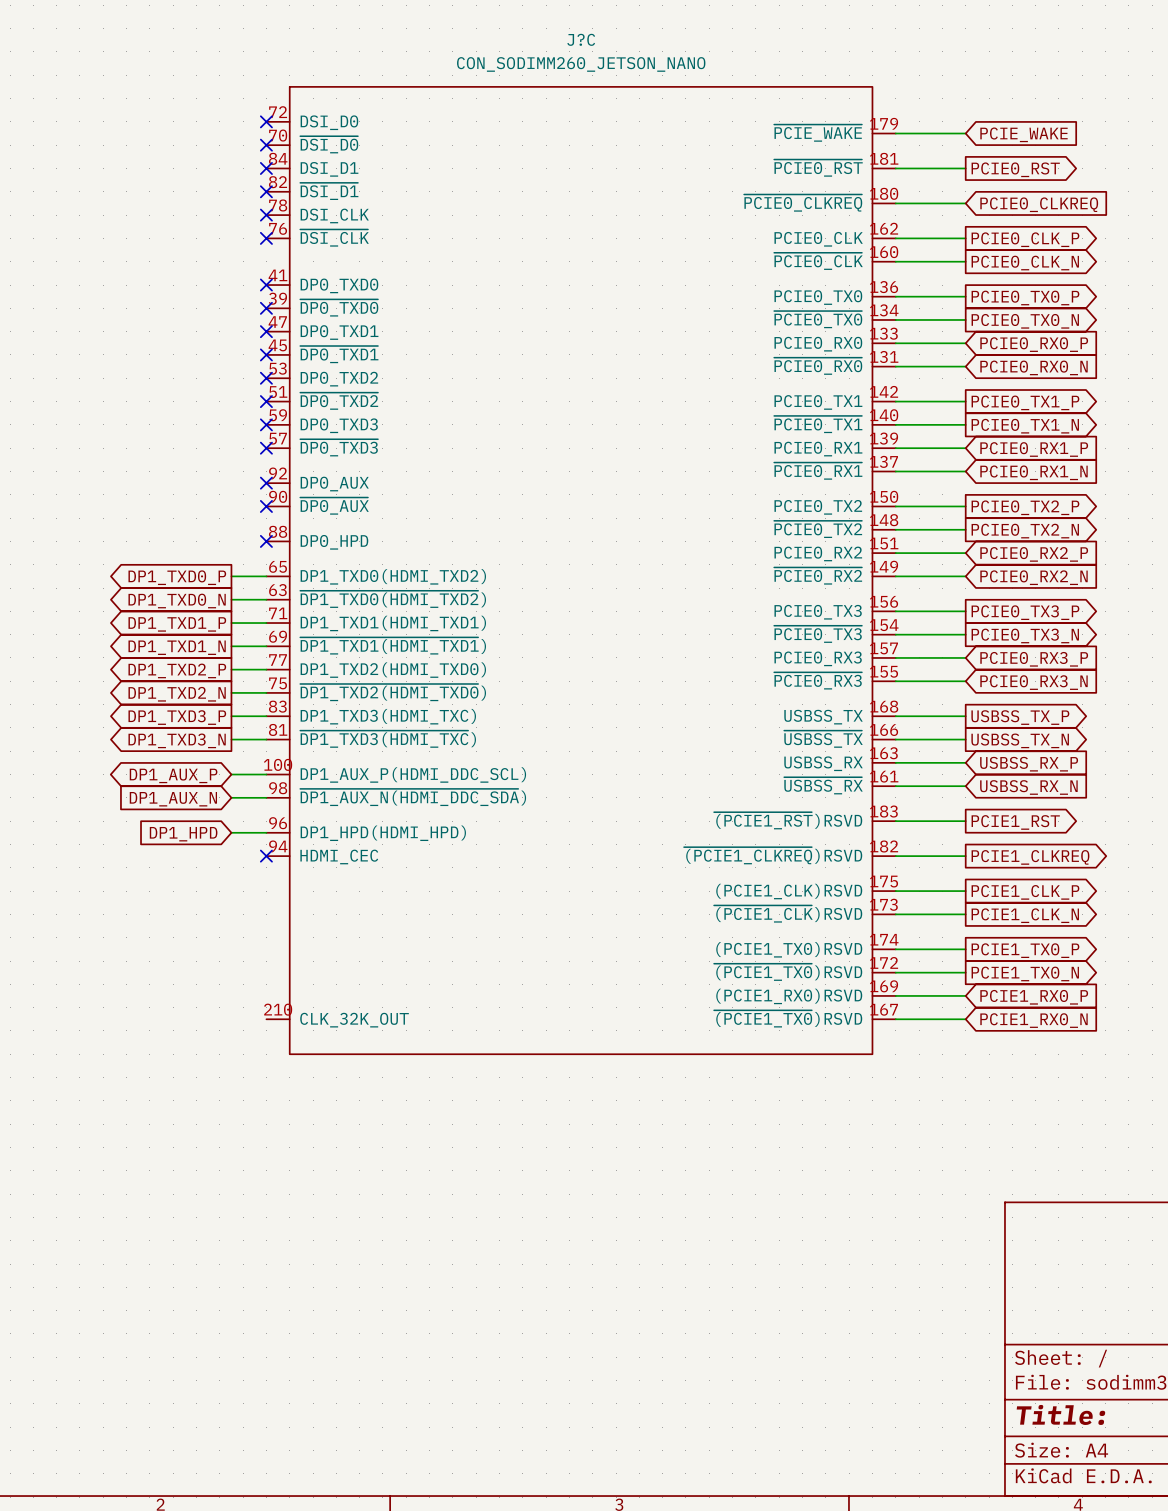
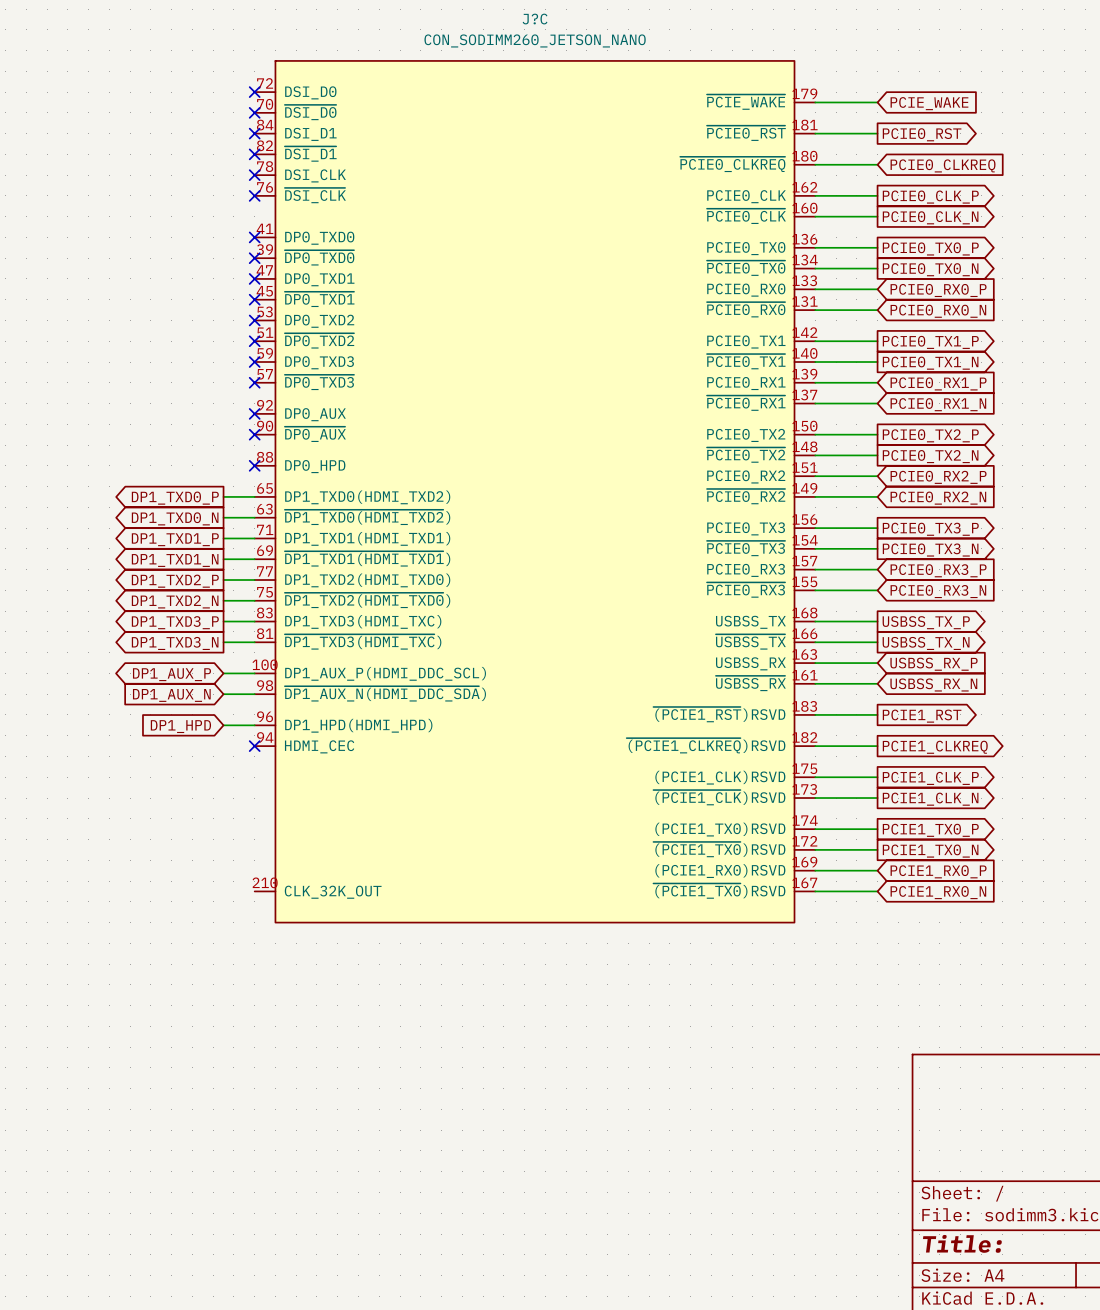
J?C symbol: [266, 86, 896, 1055] -> [254, 60, 816, 923]

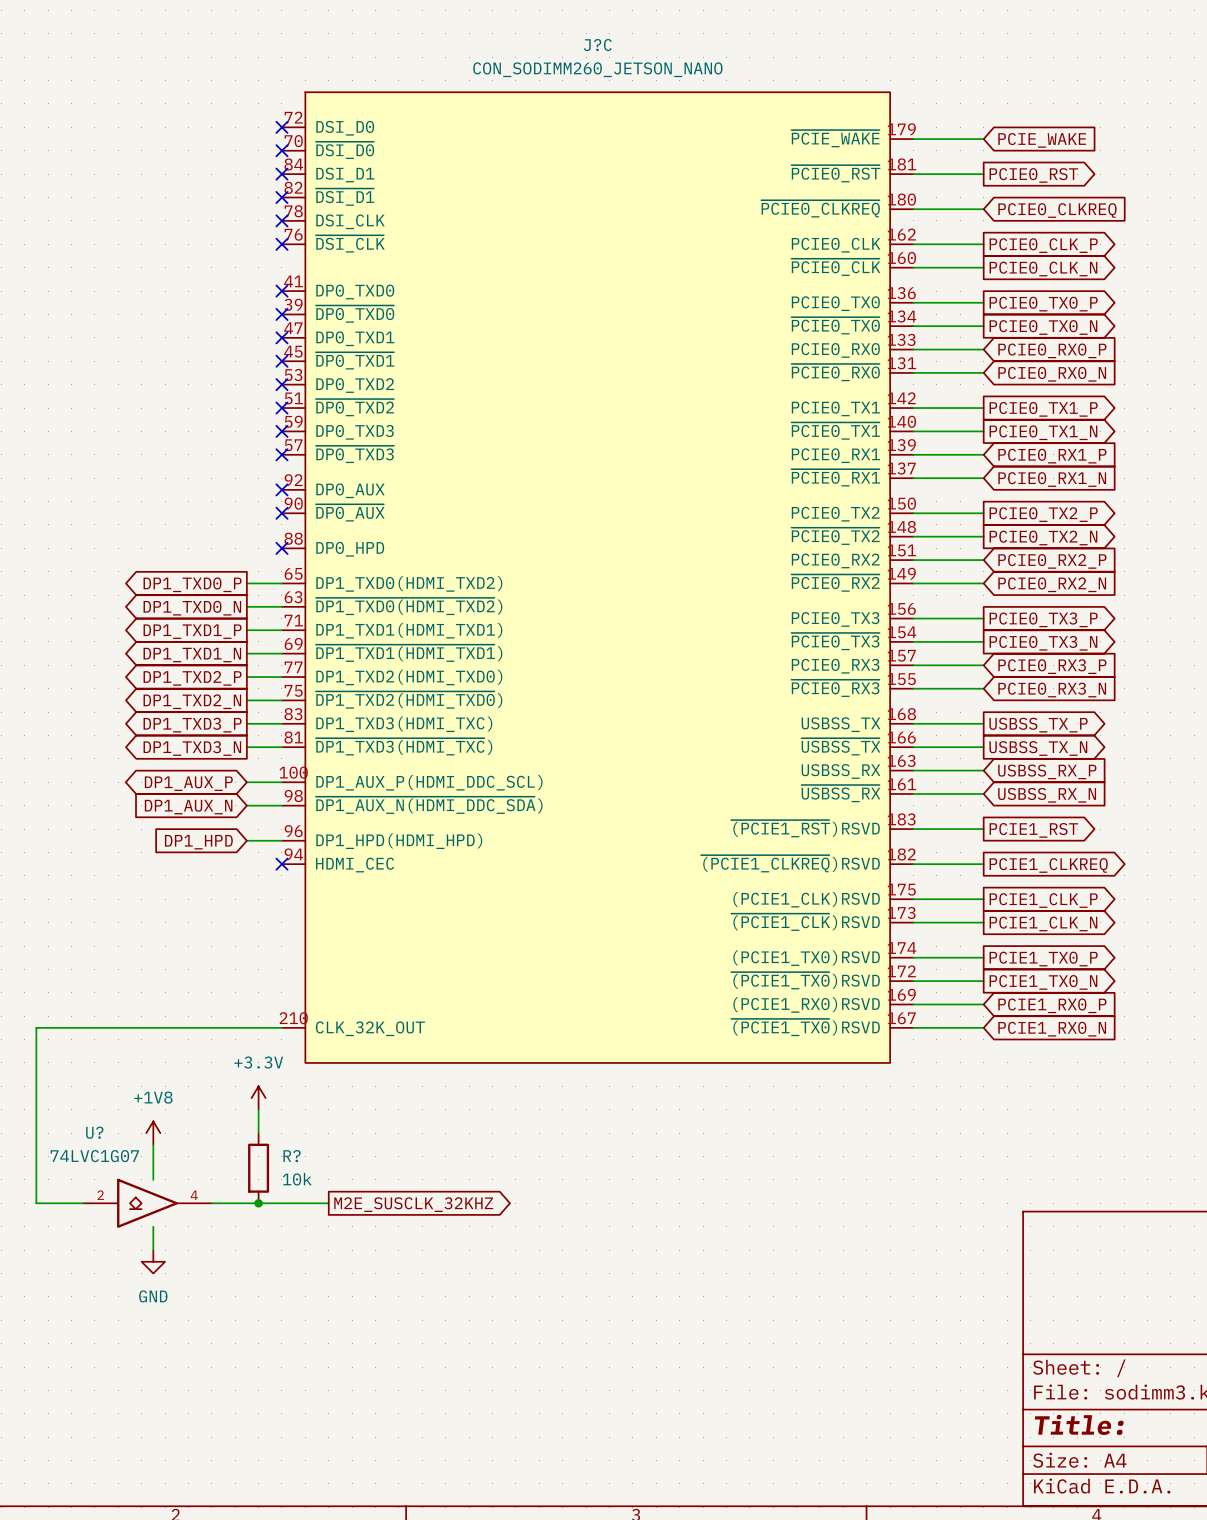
wire: none -> (281, 1027) (36, 1027) (36, 1203) (83, 1203)
power symbol: none -> +3.3V (258, 1098)
wire: none -> (258, 1109) (258, 1133)
power symbol: none -> +1V8 (153, 1133)
wire: none -> (153, 1144) (153, 1179)
R?: none -> 10k (258, 1168)
U?: none -> 74LVC1G07 (147, 1203)
wire: none -> (211, 1203) (328, 1203)
junction: none -> (258, 1203)
global label: none -> M2E_SUSCLK_32KHZ (413, 1204)
wire: none -> (153, 1226) (153, 1250)
power symbol: none -> GND (153, 1261)

